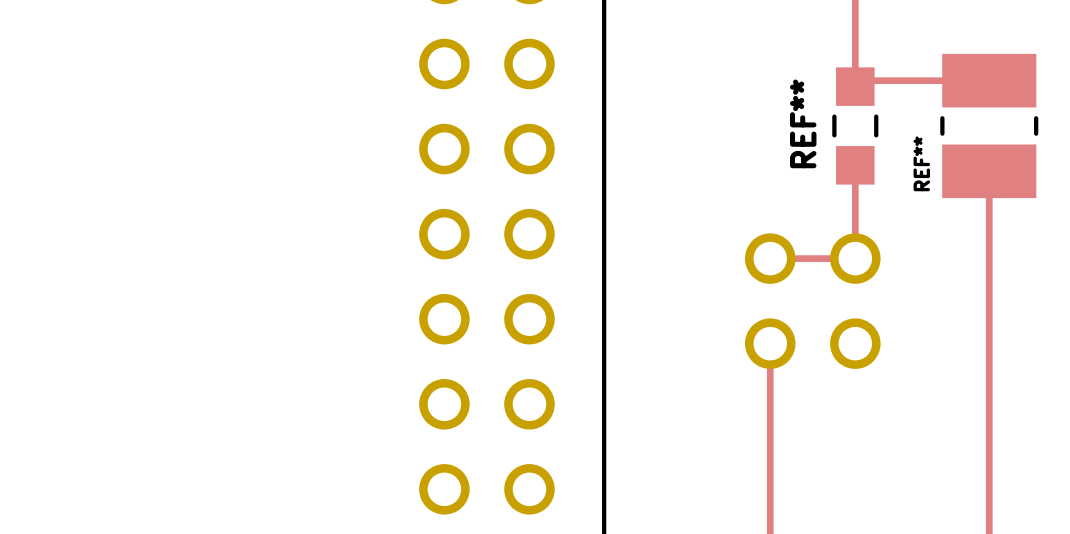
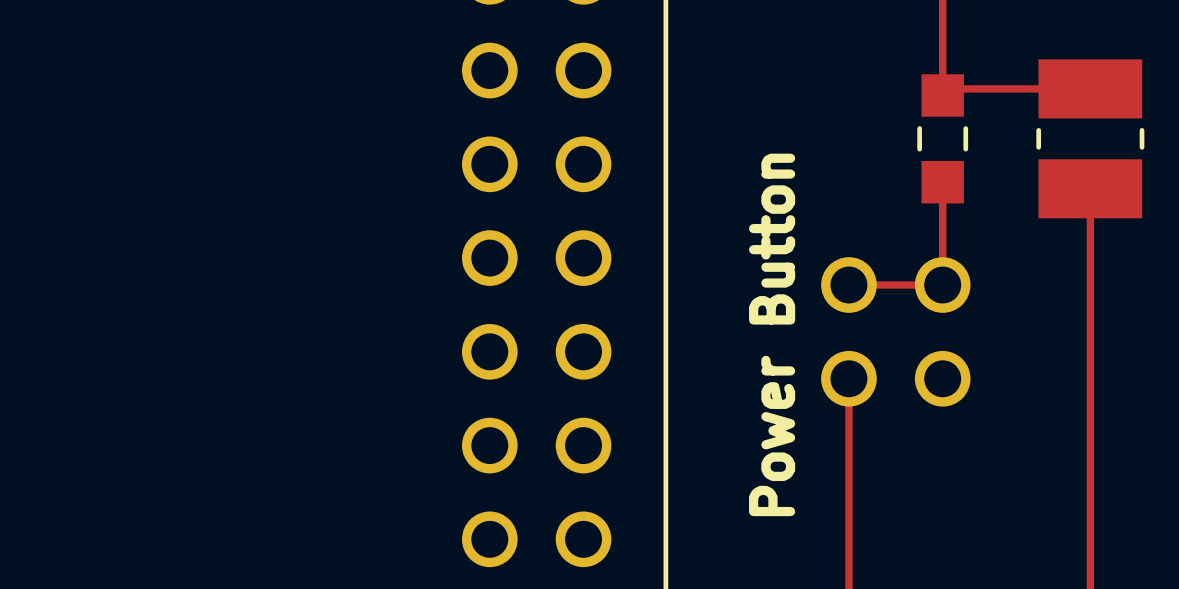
REF** name: REF** (803, 123) -> none
REF** name: REF** (921, 163) -> none
text: none -> Power Button (772, 334)

